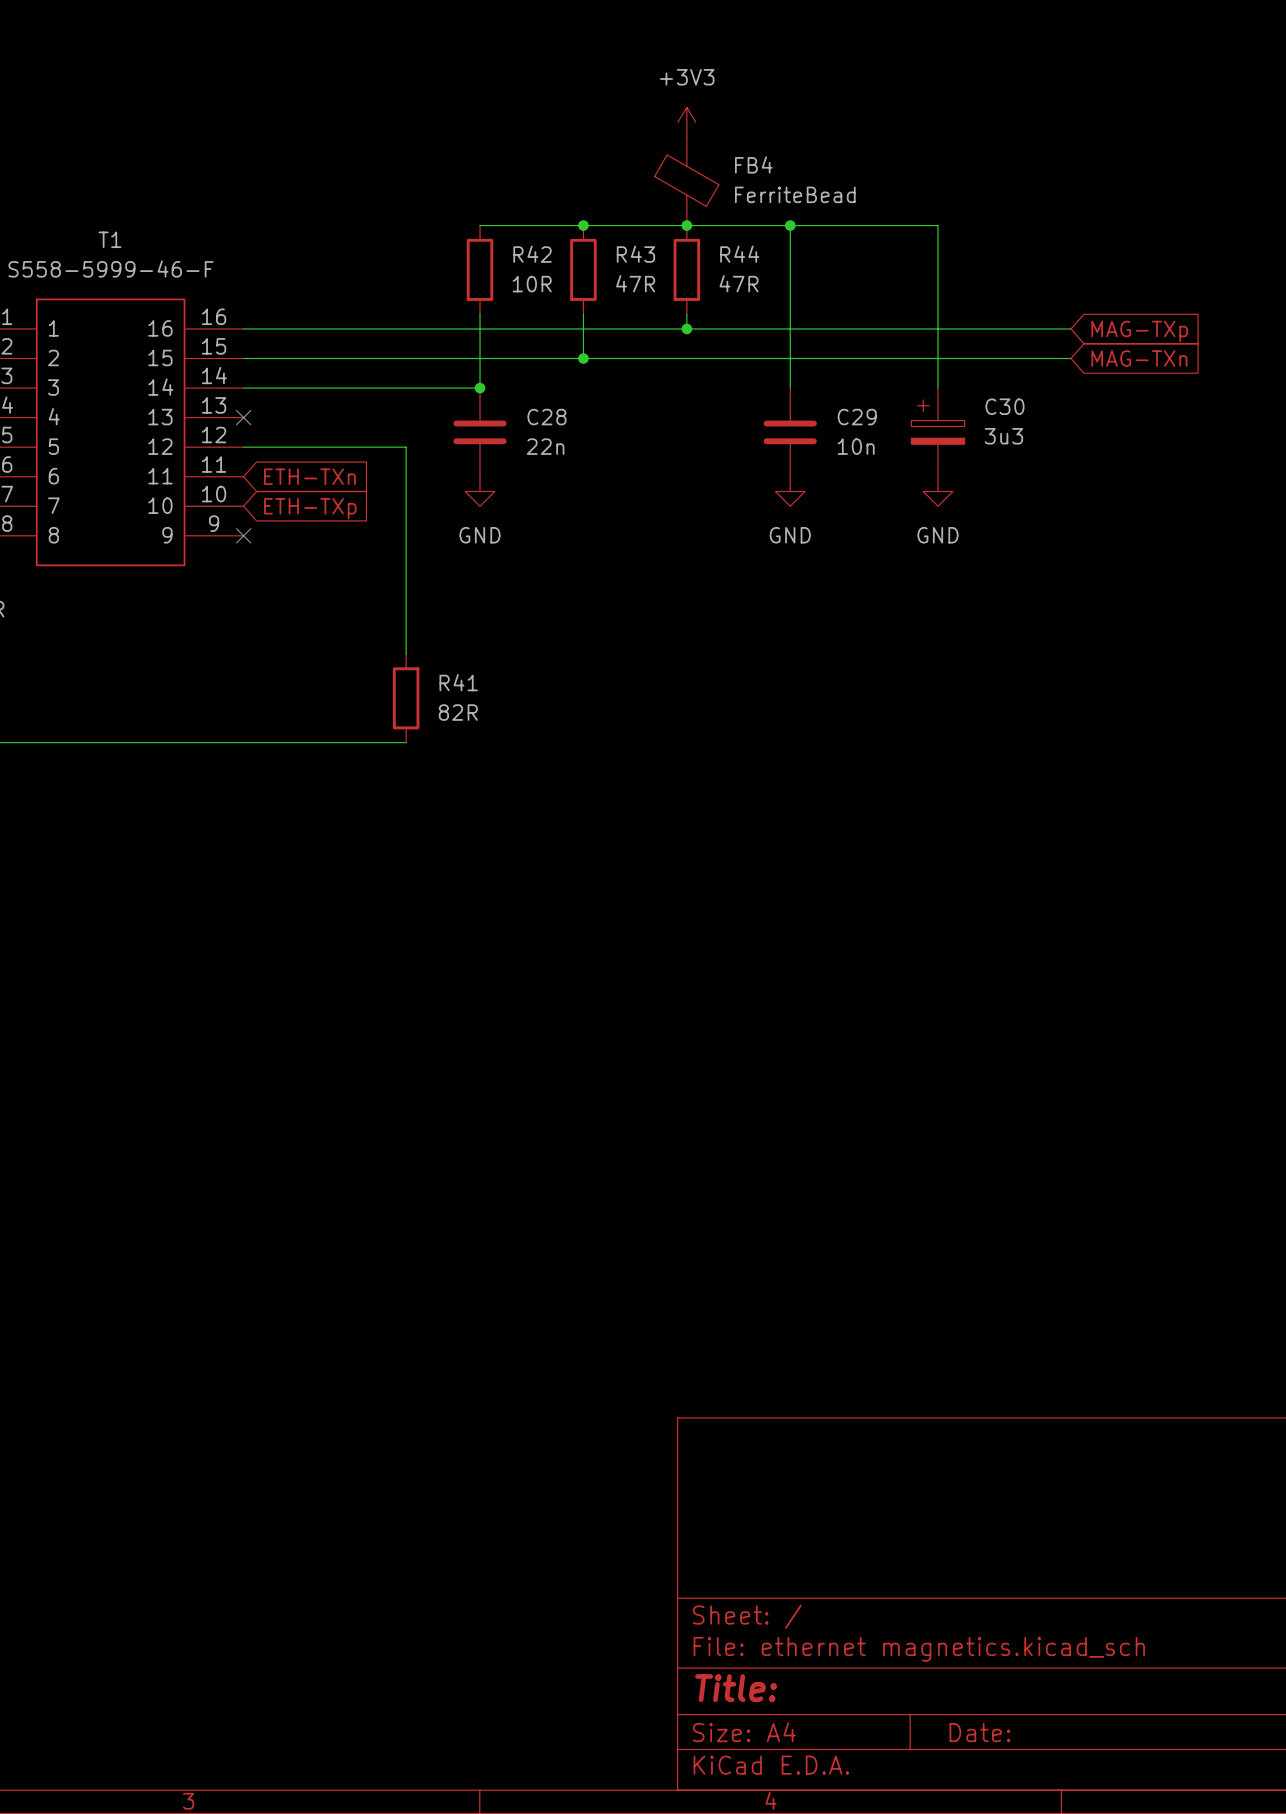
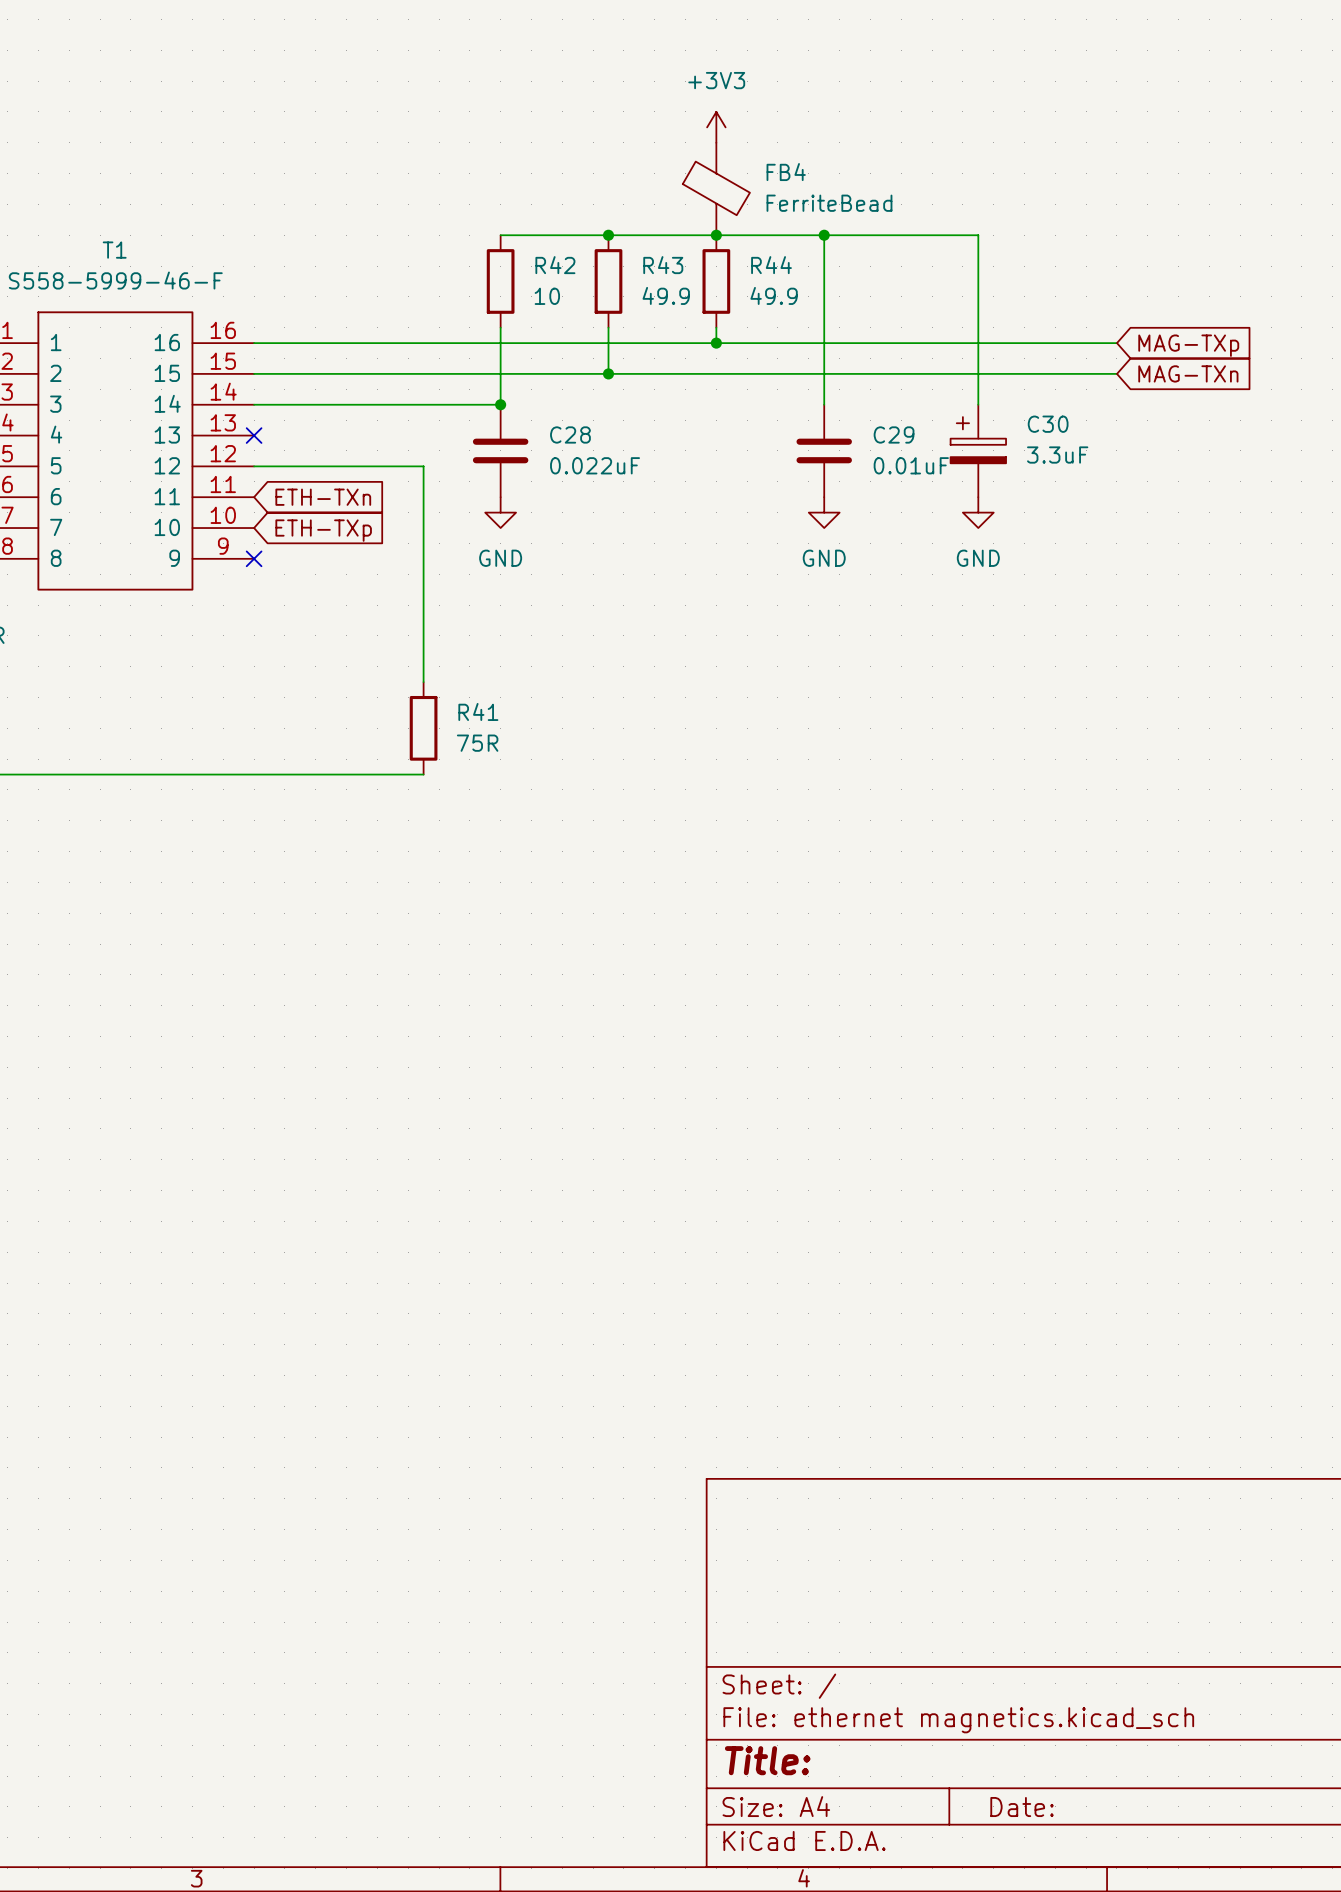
R43 value: 47R (635, 283) -> 49.9 (666, 295)
R44 value: 47R (739, 283) -> 49.9 (774, 295)
R42 value: 10R (532, 284) -> 10 (547, 296)
C30 value: 3u3 (1003, 436) -> 3.3uF (1057, 455)
C28 value: 22n (545, 446) -> 0.022uF (595, 465)
C29 value: 10n (856, 446) -> 0.01uF (911, 465)
R41 value: 82R (458, 712) -> 75R (477, 743)

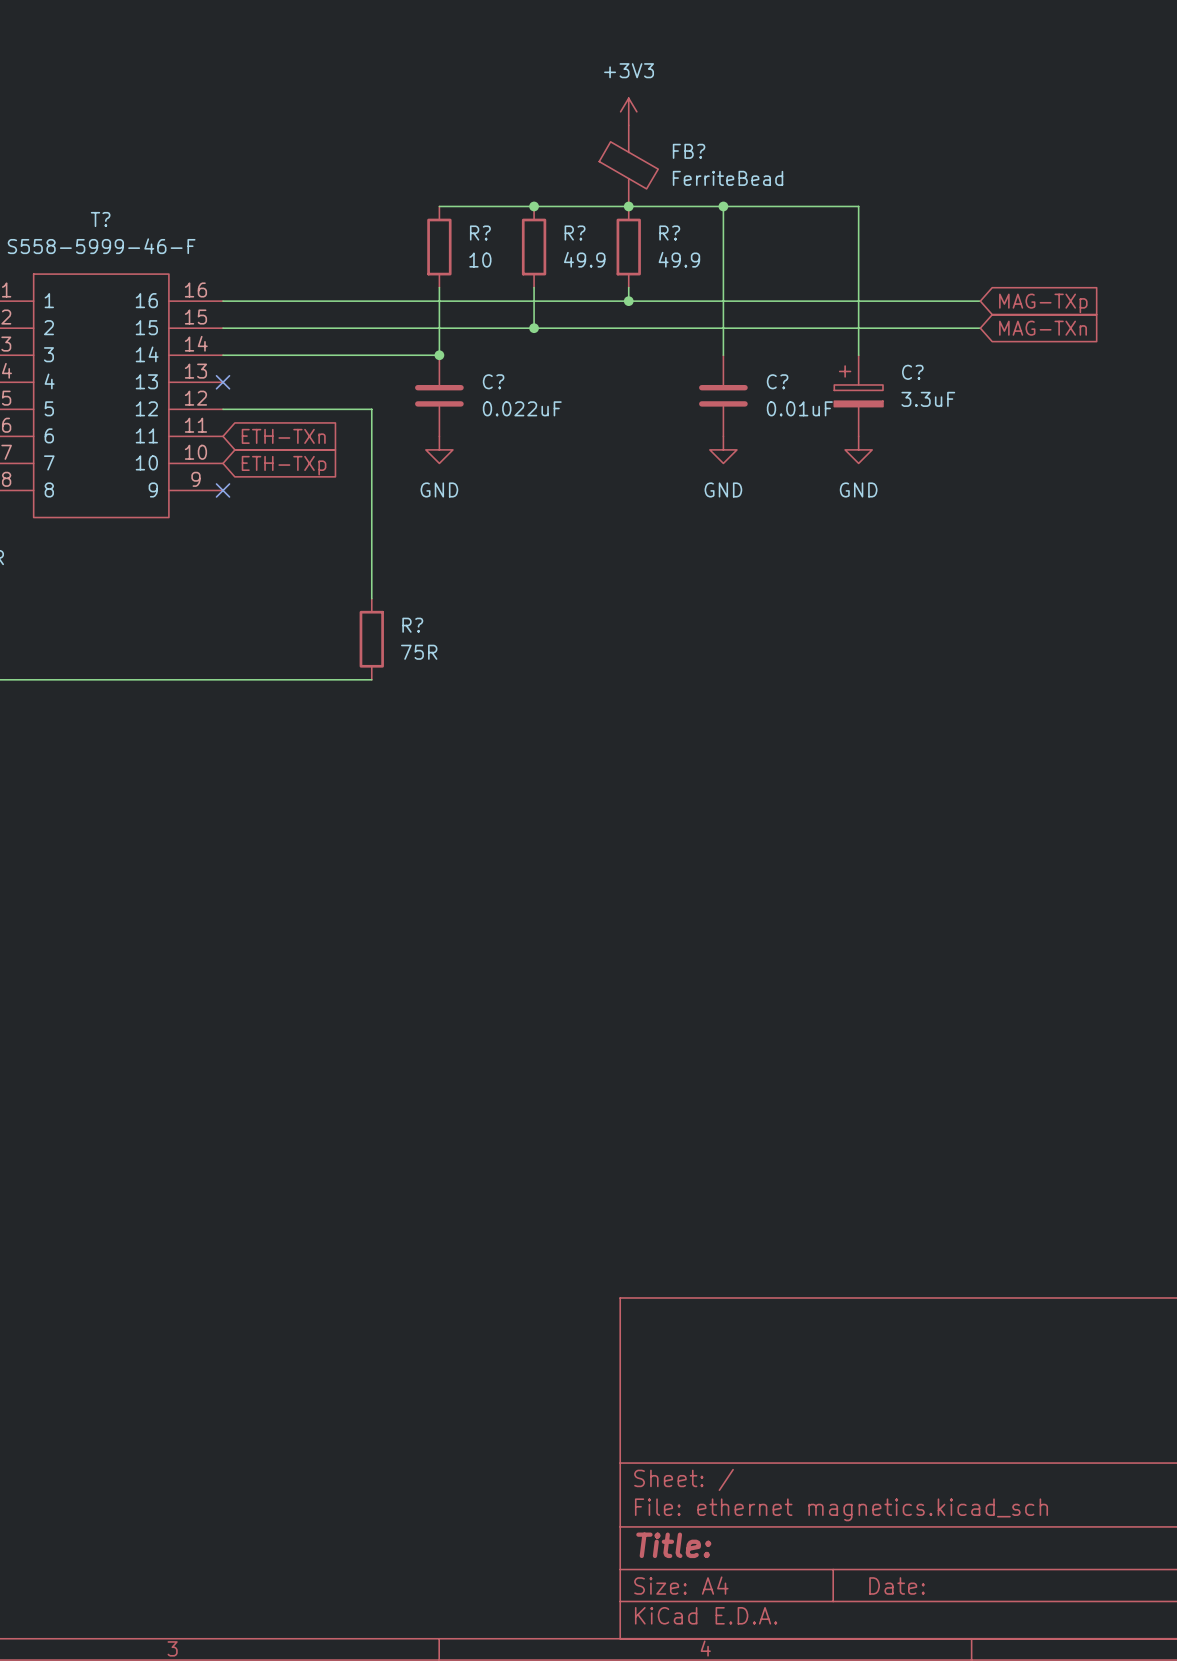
FB4 name: FB4 (786, 172) -> FB? (689, 151)
T1 name: T1 (114, 250) -> T? (100, 219)
R42 name: R42 (555, 265) -> R? (480, 233)
R43 name: R43 (663, 265) -> R? (575, 233)
R44 name: R44 (771, 265) -> R? (669, 233)
C30 name: C30 (1048, 424) -> C? (912, 372)
C28 name: C28 (570, 434) -> C? (493, 381)
C29 name: C29 (894, 434) -> C? (777, 381)
R41 name: R41 (478, 711) -> R? (412, 625)

